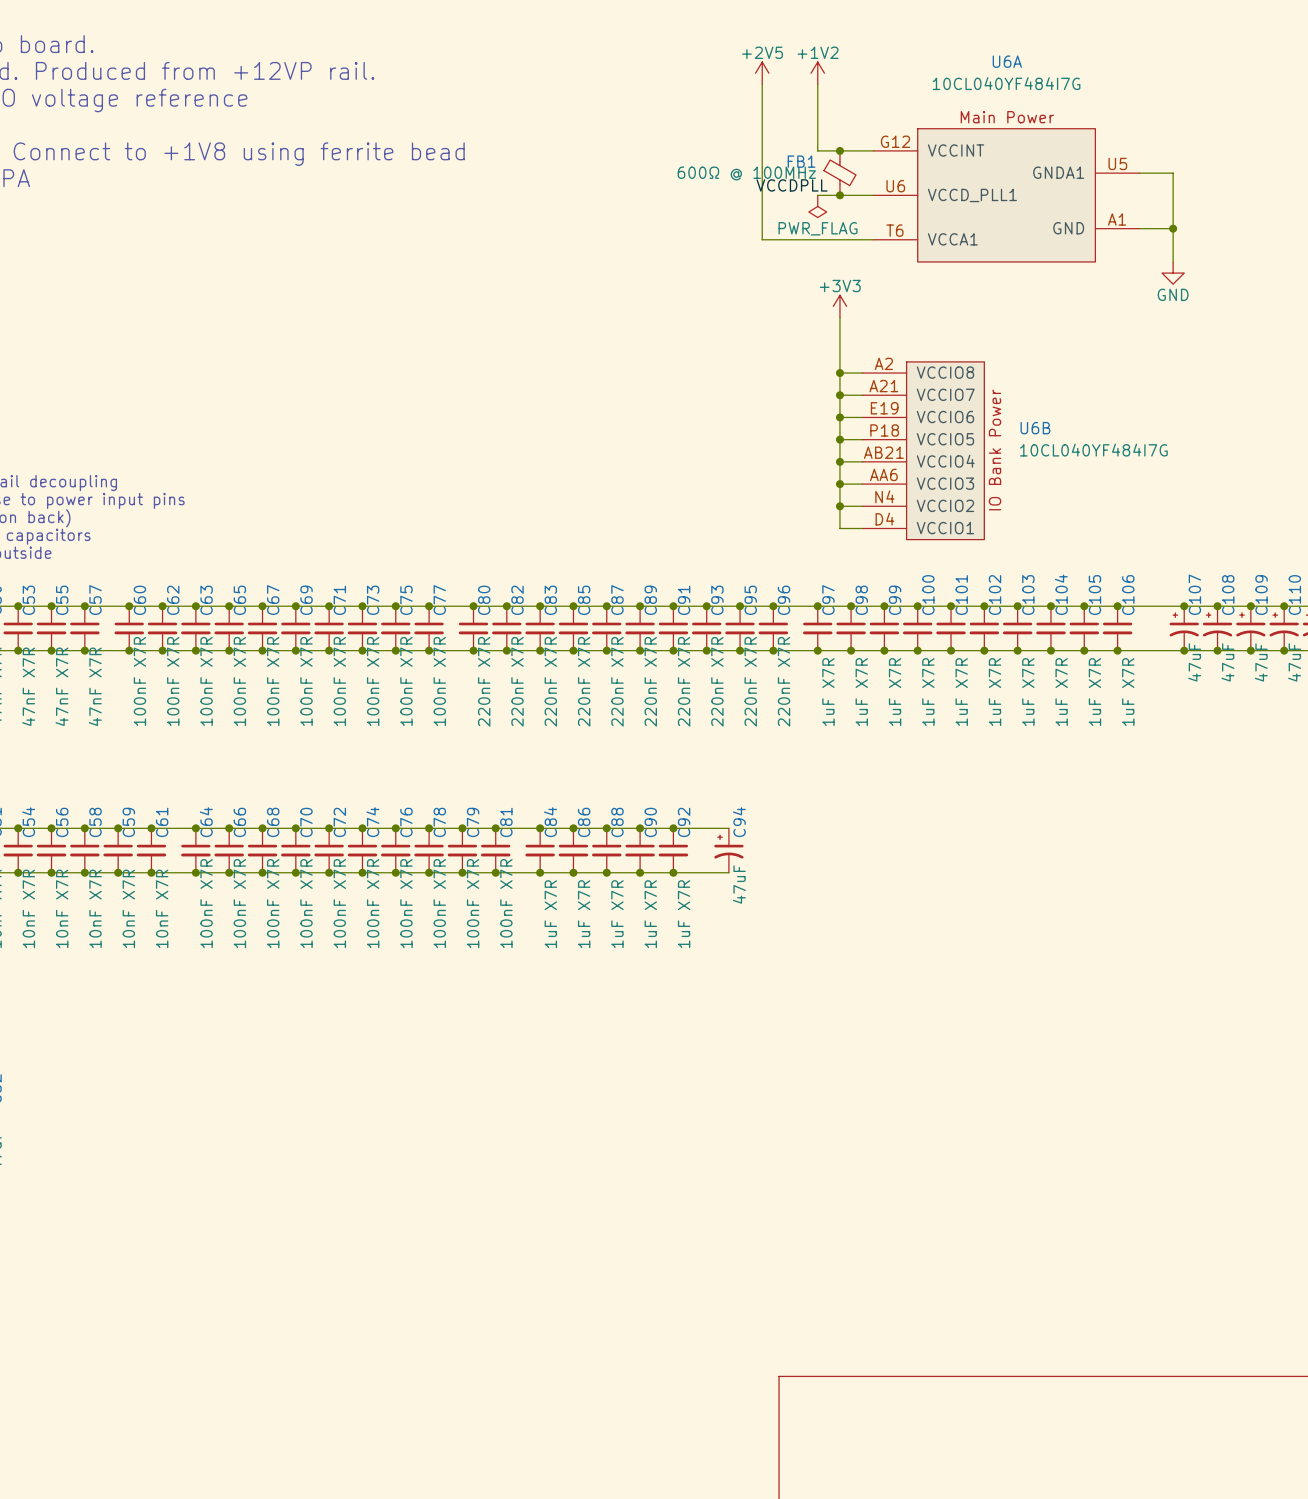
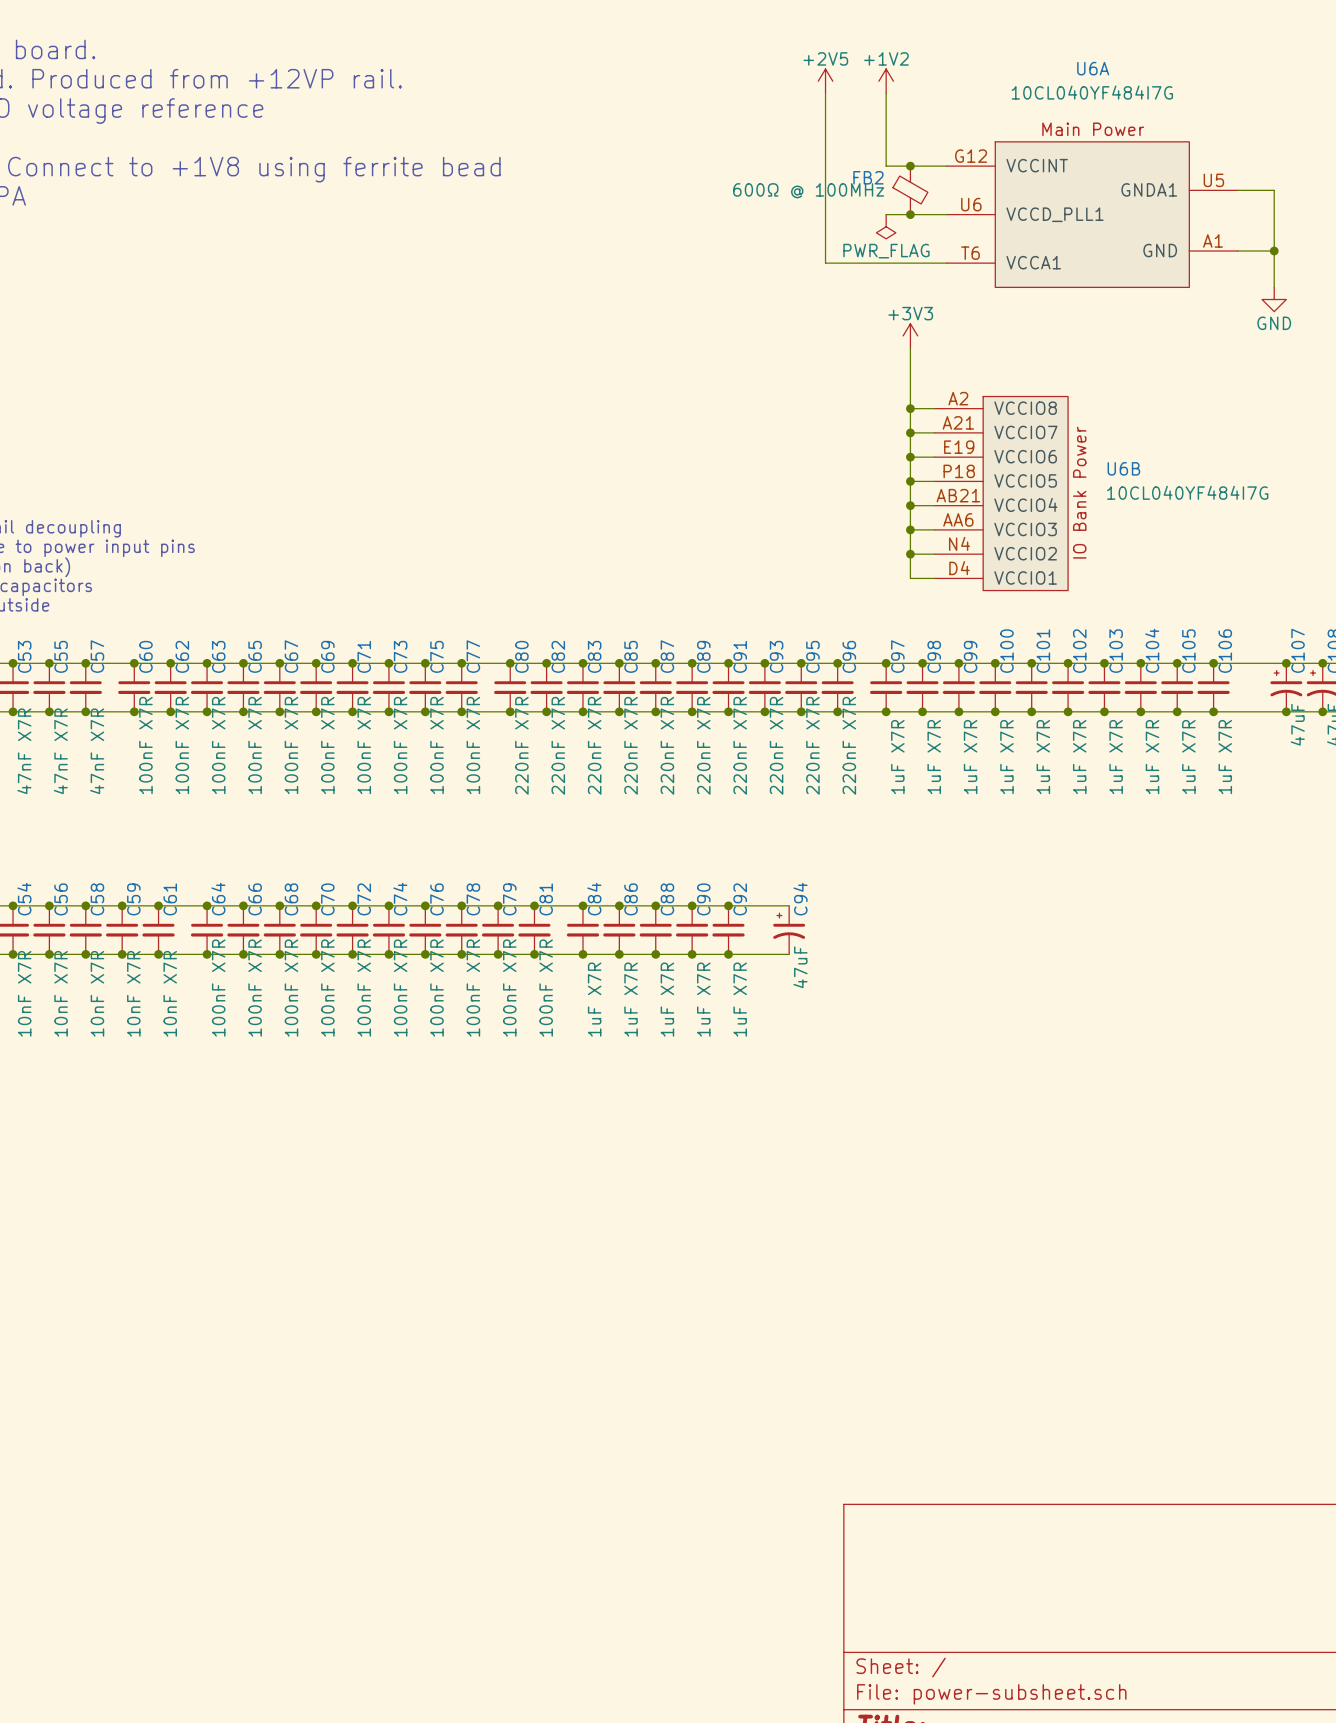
FB1 name: FB1 (801, 161) -> FB2 (868, 177)
label: VCCDPLL (792, 185) -> none

